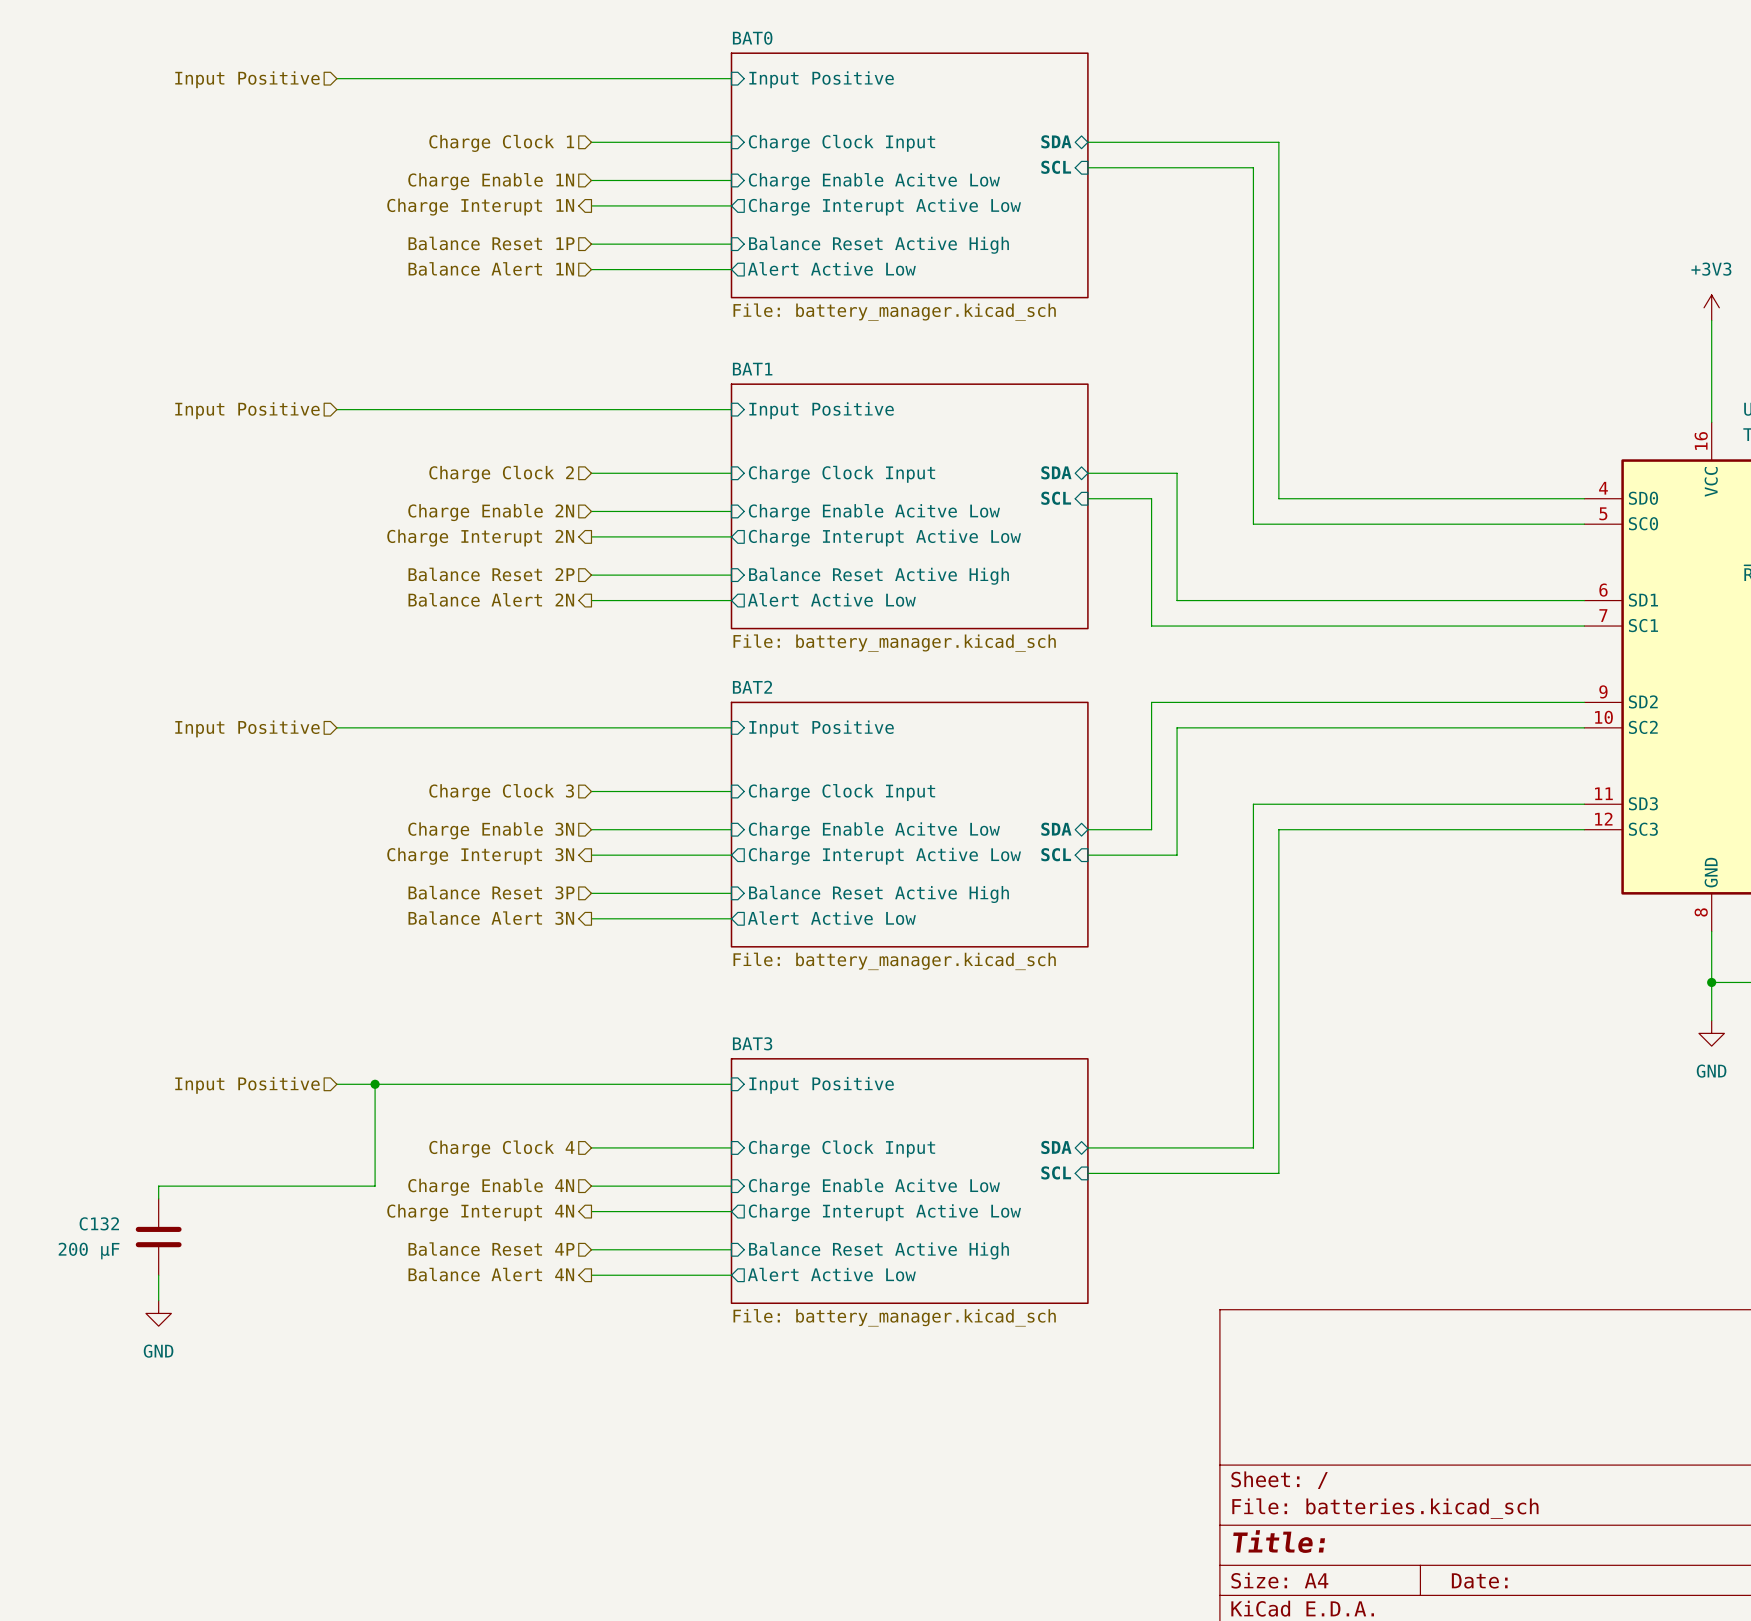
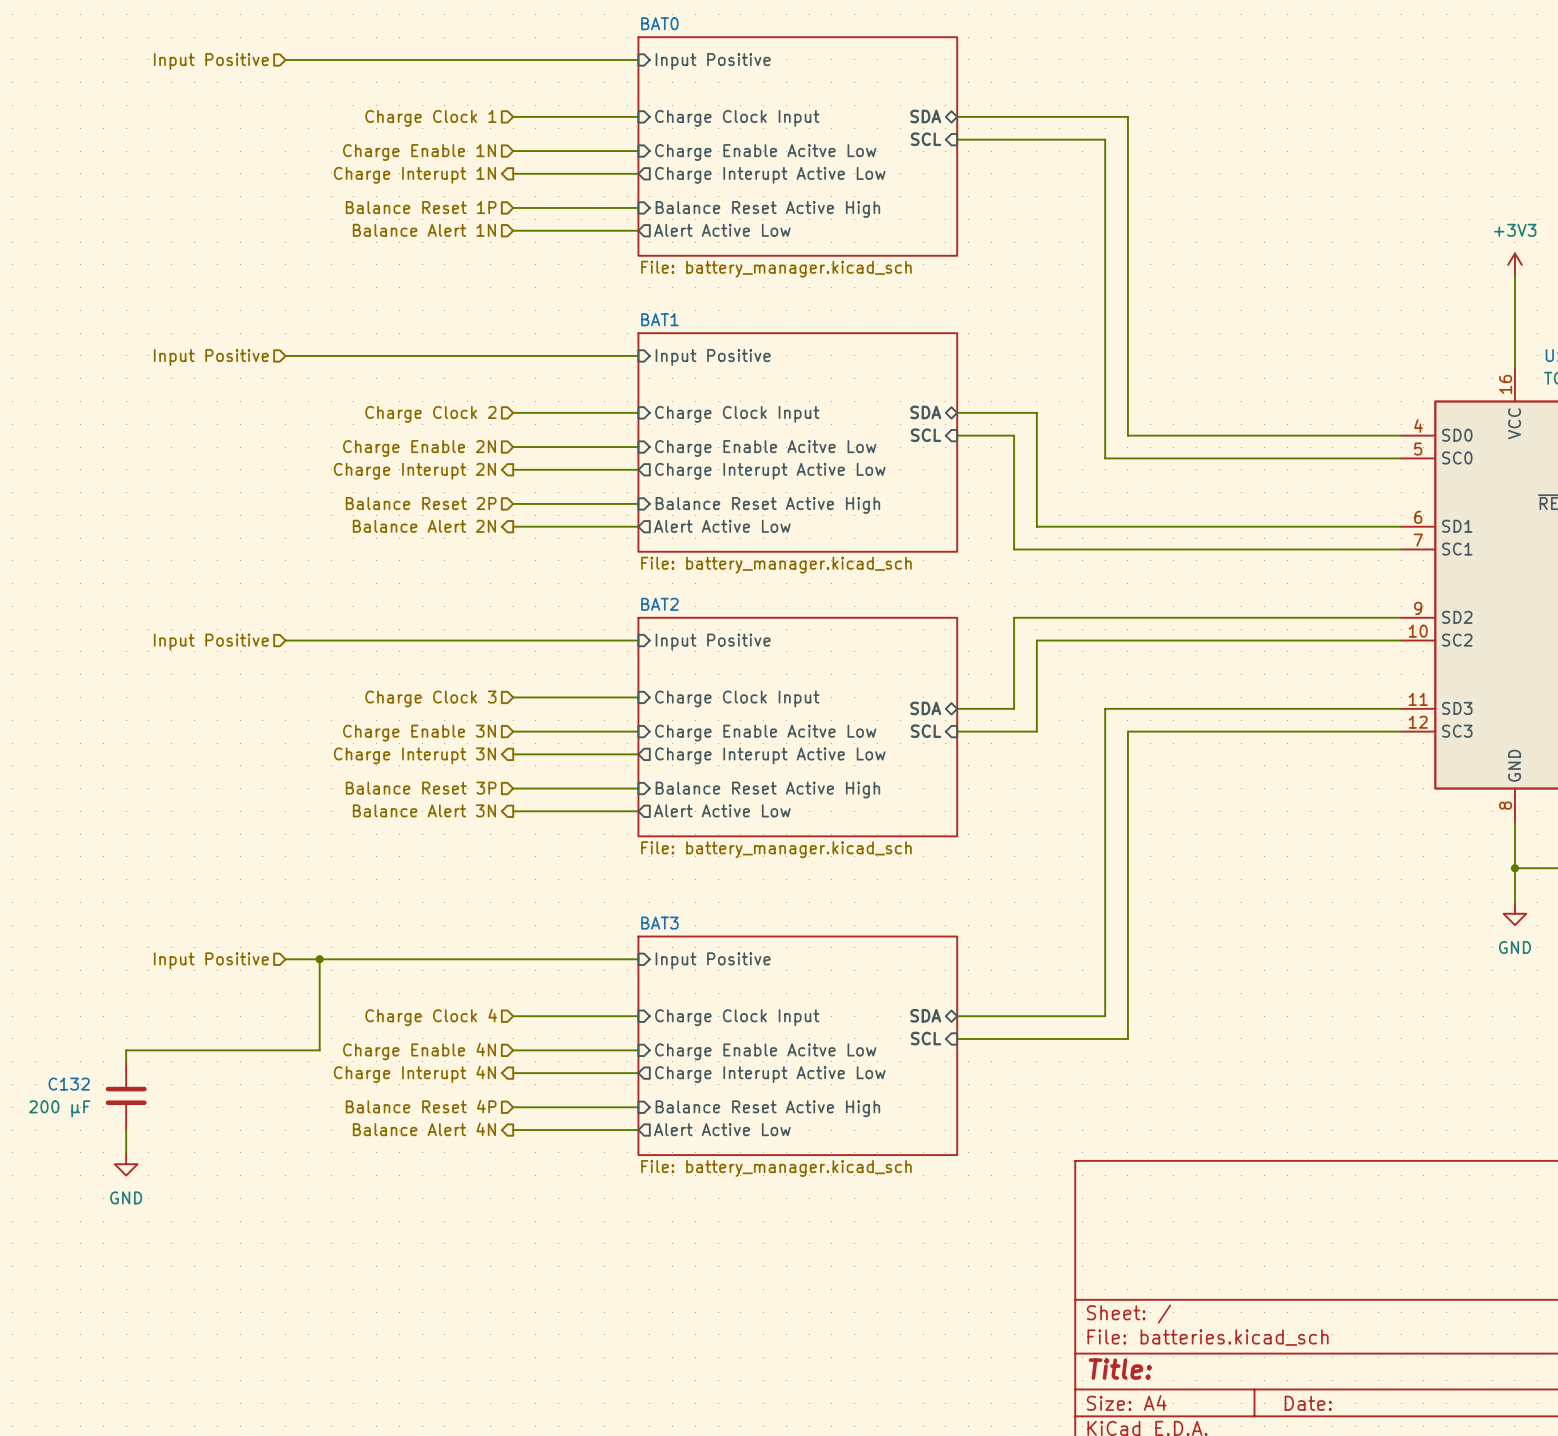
sheet pin: none -> SDA (925, 708)
wire: none -> (957, 708) (1014, 708)
wire: (1151, 804) (1151, 829) -> (1036, 731) (1014, 731)
sheet pin shape: bidirectional (1056, 829) -> input (926, 731)
sheet pin: SDA (1056, 829) -> SCL (926, 731)
wire: (1177, 829) (1177, 855) (1087, 855) -> none
sheet pin: SCL (1056, 854) -> none

